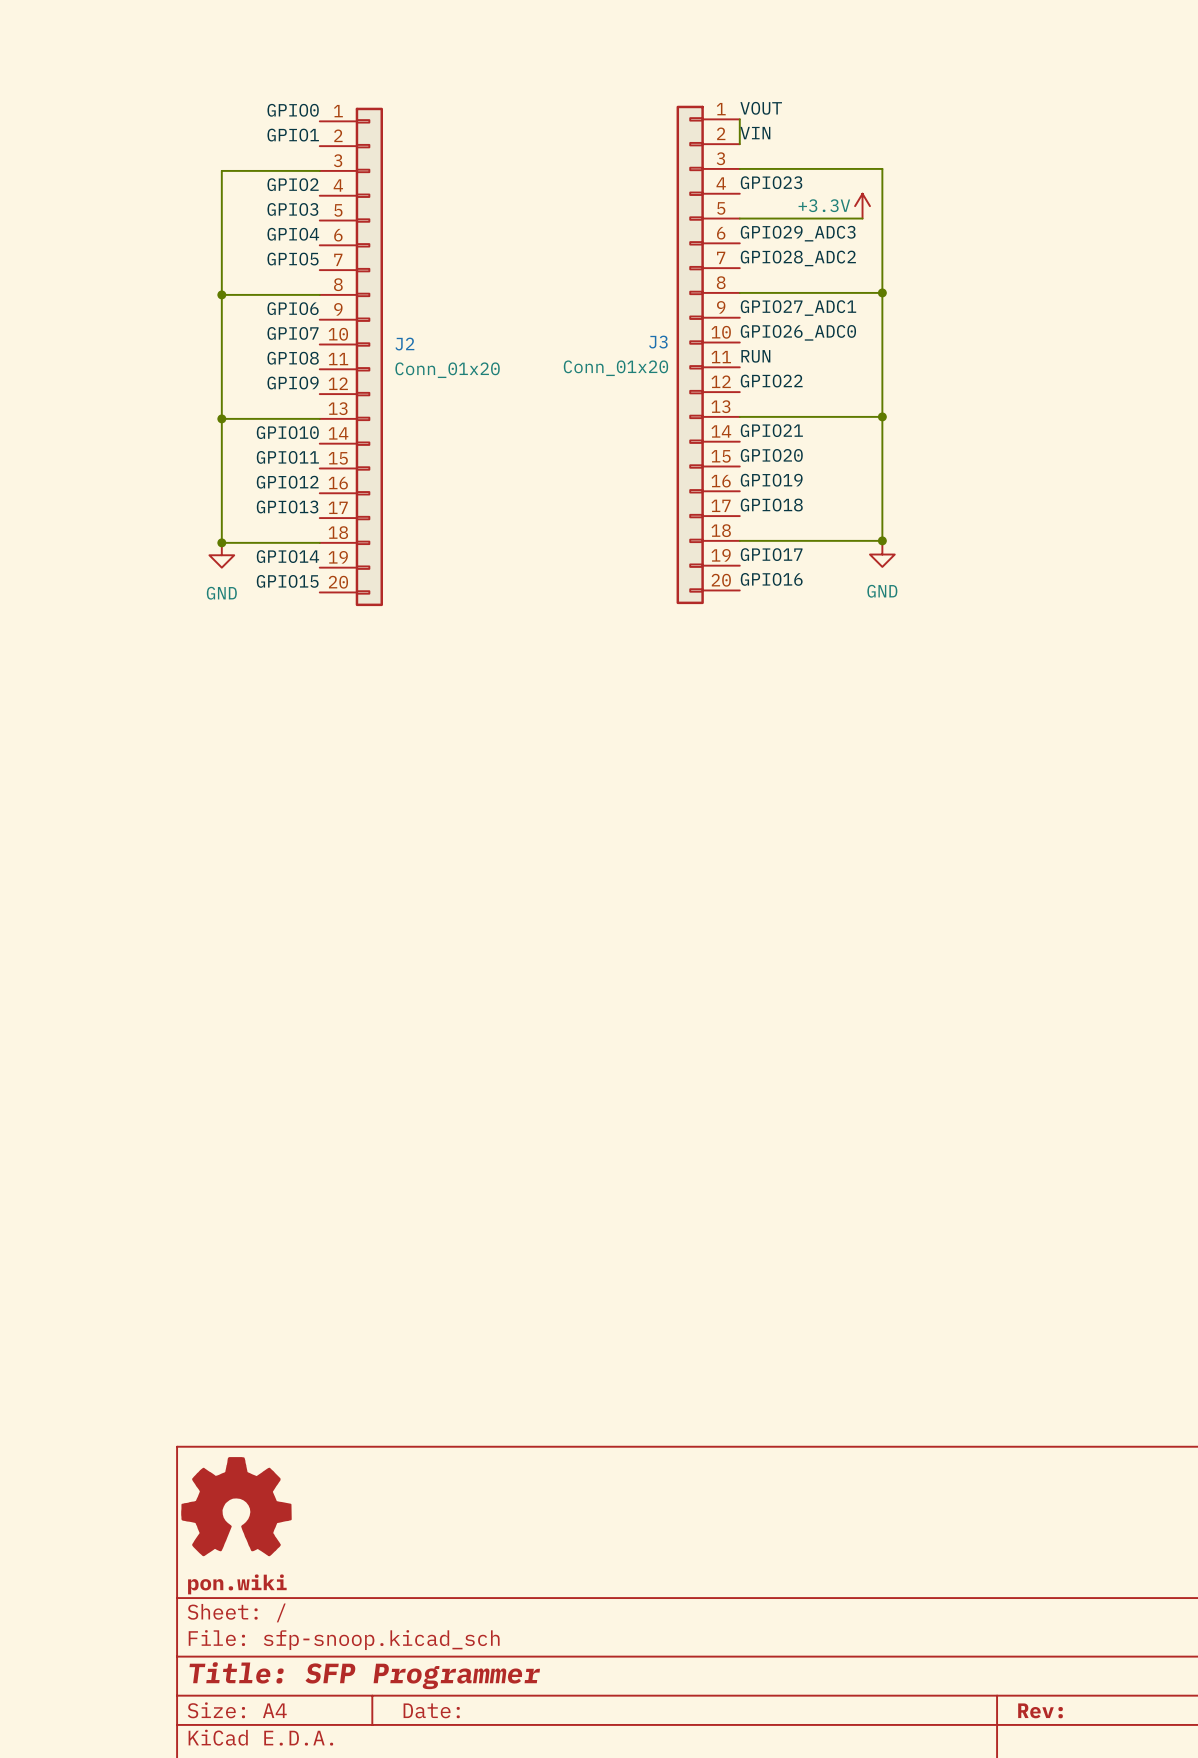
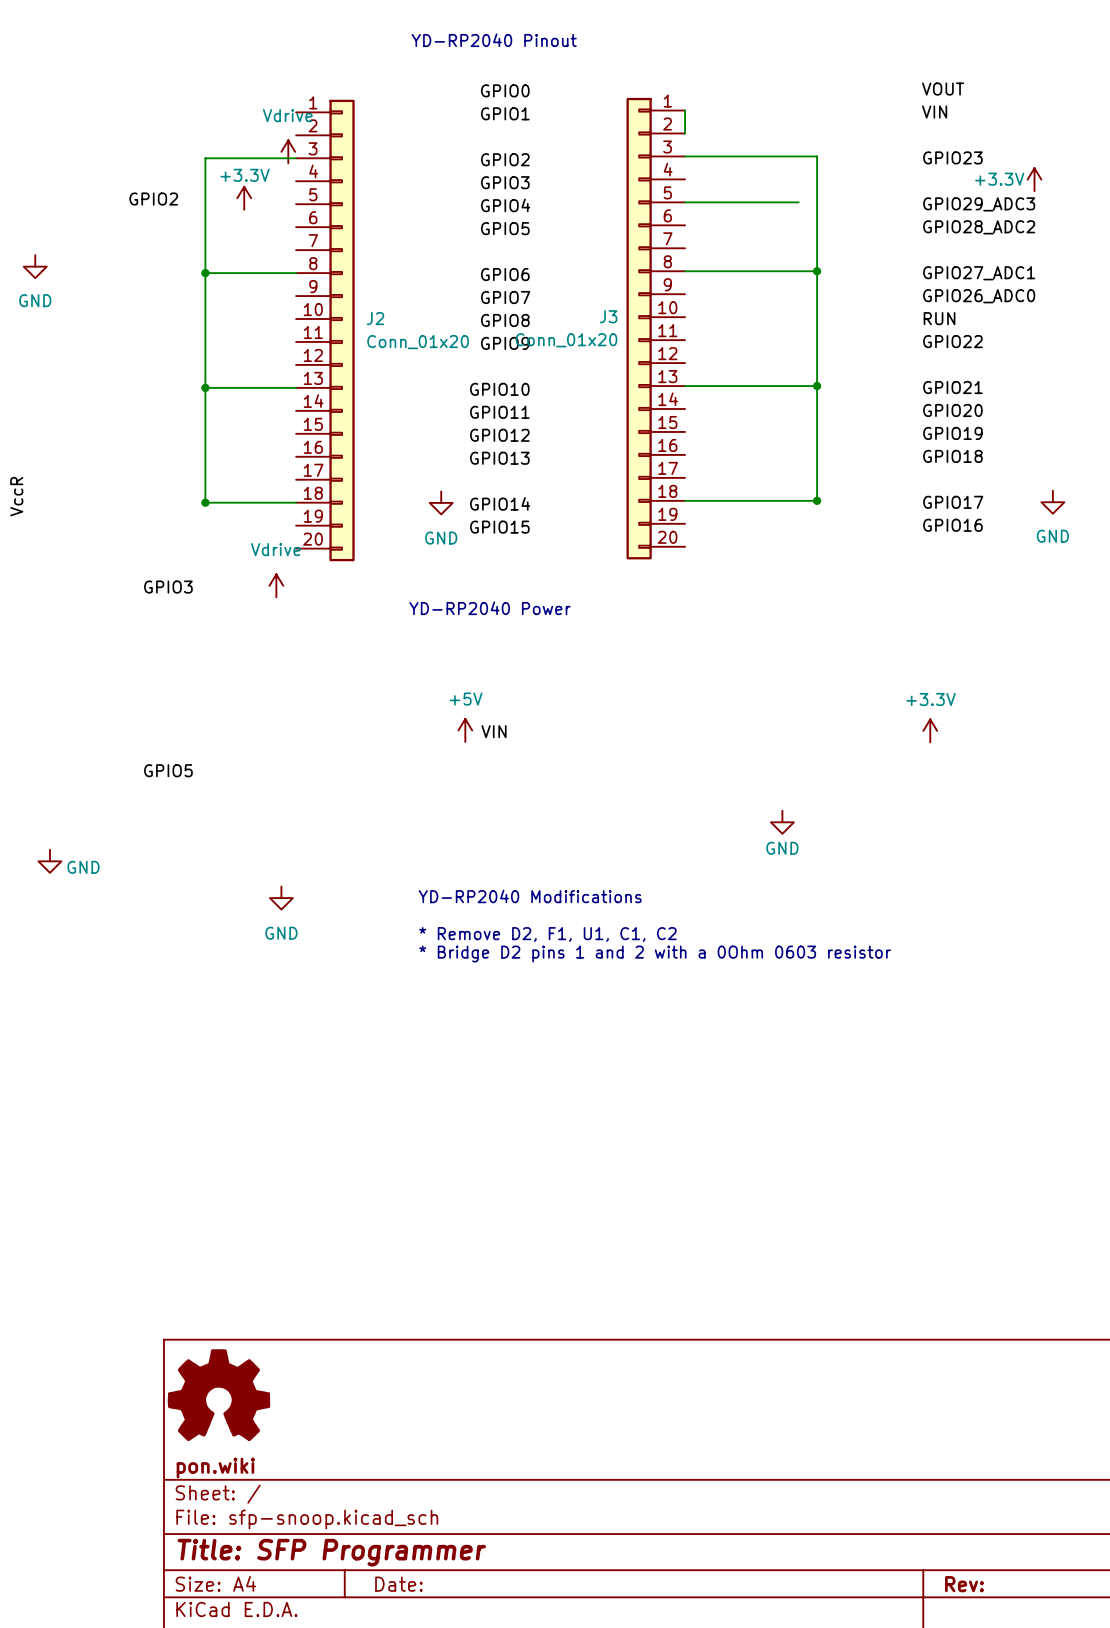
text: none -> YD-RP2040 Pinout (494, 40)
label: none -> VOUT (943, 89)
label: none -> GPIO0 (505, 90)
label: VOUT (761, 108) -> none
label: GPIO0 (293, 110) -> none
label: none -> VIN (934, 111)
label: none -> GPIO1 (505, 113)
label: VIN (755, 133) -> none
label: GPIO1 (293, 135) -> none
power symbol: none -> Vdrive (288, 151)
label: none -> GPIO23 (952, 157)
label: none -> GPIO2 (505, 159)
label: GPIO23 (771, 182) -> none
label: GPIO2 (293, 184) -> none
power symbol: none -> +3.3V (1034, 179)
label: none -> GPIO3 (505, 182)
power symbol: +3.3V (862, 206) -> none
label: GPIO3 (292, 209) -> none
label: none -> GPIO2 (153, 199)
power symbol: none -> +3.3V (244, 198)
label: none -> GPIO29_ADC3 (979, 204)
label: none -> GPIO4 (505, 205)
label: GPIO29_ADC3 (798, 233) -> none
label: GPIO4 (293, 234) -> none
label: none -> GPIO5 (505, 228)
label: none -> GPIO28_ADC2 (979, 227)
label: GPIO28_ADC2 (798, 258) -> none
label: GPIO5 (293, 259) -> none
power symbol: none -> GND (35, 266)
label: none -> GPIO27_ADC1 (979, 273)
label: none -> GPIO6 (505, 274)
label: GPIO6 (293, 308) -> none
label: GPIO27_ADC1 (798, 308) -> none
label: none -> GPIO26_ADC0 (979, 296)
label: none -> GPIO7 (505, 297)
label: GPIO26_ADC0 (798, 332) -> none
label: GPIO7 (293, 333) -> none
label: none -> RUN (939, 318)
label: none -> GPIO8 (505, 320)
label: RUN (755, 356) -> none
label: GPIO8 (293, 358) -> none
label: none -> GPIO22 (952, 341)
label: none -> GPIO9 (505, 343)
label: GPIO22 (771, 381) -> none
label: GPIO9 (293, 383) -> none
label: none -> GPIO21 (952, 387)
label: none -> GPIO10 (499, 389)
label: GPIO21 (771, 430) -> none
label: GPIO10 (287, 432) -> none
label: none -> GPIO20 (952, 410)
label: none -> GPIO11 (499, 412)
label: GPIO20 (771, 455) -> none
label: GPIO11 (287, 457) -> none
label: none -> GPIO19 (952, 433)
label: none -> GPIO12 (499, 435)
label: GPIO19 (771, 480) -> none
label: GPIO12 (287, 482) -> none
label: none -> GPIO18 (952, 456)
label: none -> GPIO13 (499, 458)
label: GPIO18 (771, 505) -> none
label: GPIO13 (287, 507) -> none
label: none -> VccR (16, 496)
label: none -> GPIO17 (953, 502)
power symbol: none -> GND (1052, 502)
power symbol: none -> GND (441, 502)
label: none -> GPIO14 (500, 503)
label: GPIO17 (771, 554) -> none
power symbol: GND (882, 554) -> none
power symbol: GND (221, 555) -> none
label: GPIO14 (287, 556) -> none
label: none -> GPIO16 (952, 525)
label: none -> GPIO15 (499, 527)
label: GPIO16 (771, 579) -> none
label: GPIO15 (287, 581) -> none
power symbol: none -> Vdrive (276, 585)
label: none -> GPIO3 (168, 587)
text: none -> YD-RP2040 Power (489, 608)
power symbol: none -> +5V (465, 730)
power symbol: none -> +3.3V (930, 730)
label: none -> VIN (494, 731)
label: none -> GPIO5 (168, 770)
power symbol: none -> GND (782, 822)
power symbol: none -> GND (49, 861)
text: none -> YD-RP2040 Modifications (530, 896)
power symbol: none -> GND (281, 898)
text: none -> * Remove D2, F1, U1, C1, C2 (547, 934)
text: none -> * Bridge D2 pins 1 and 2 with a 0Ohm 0603 resistor (655, 954)

